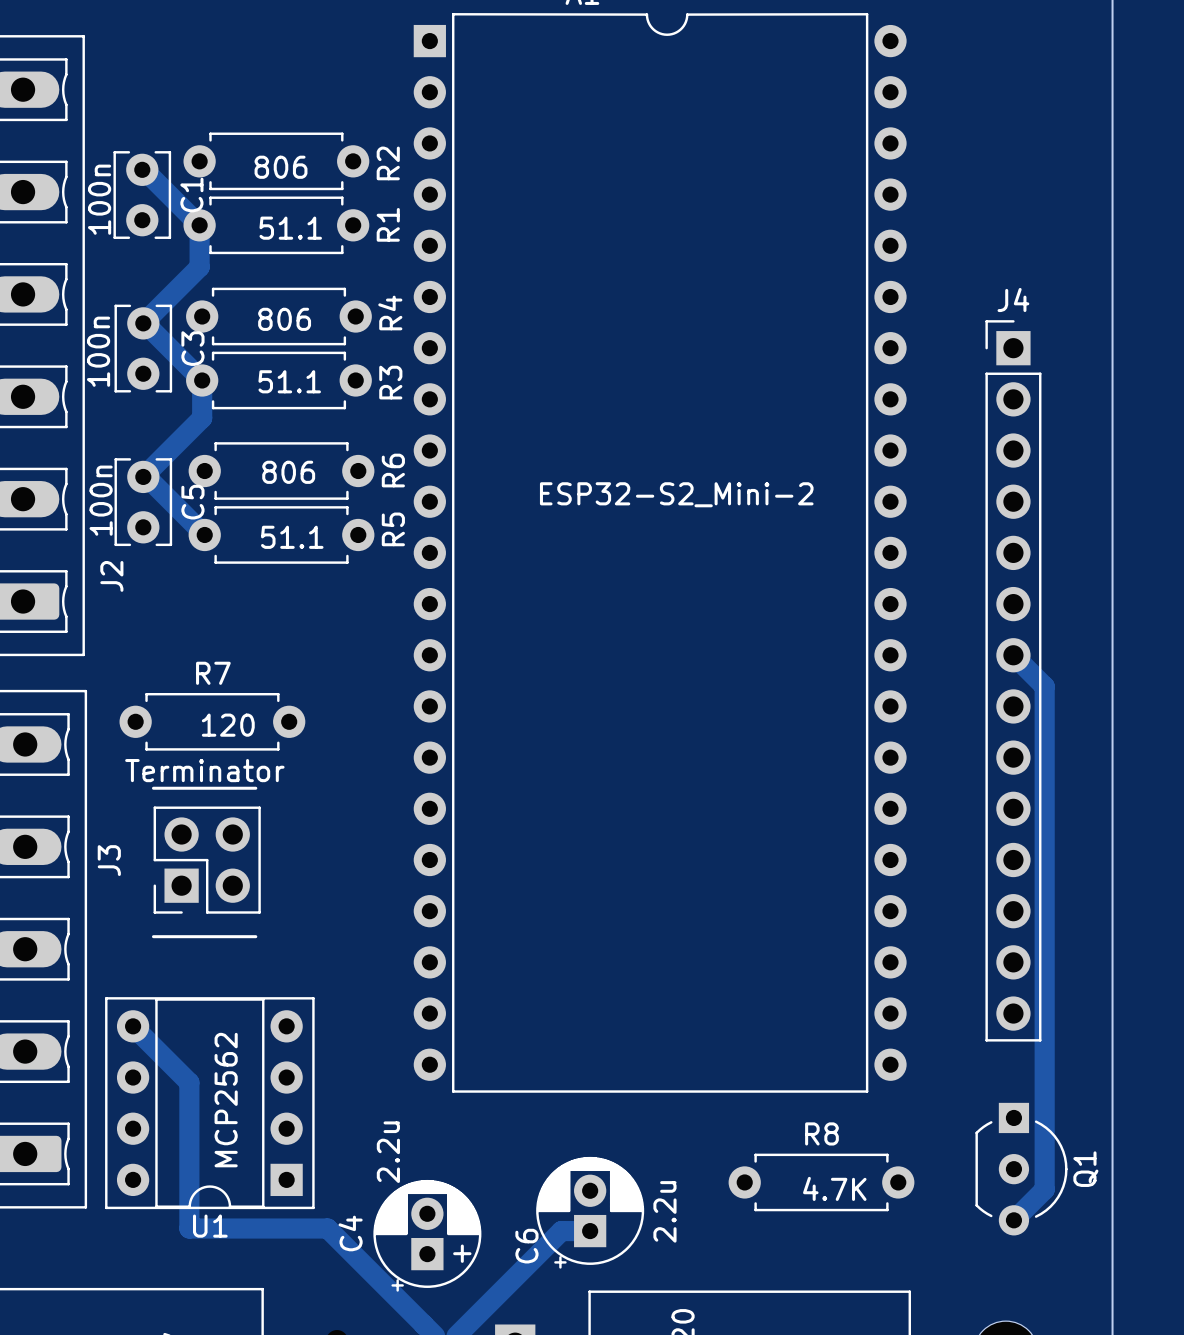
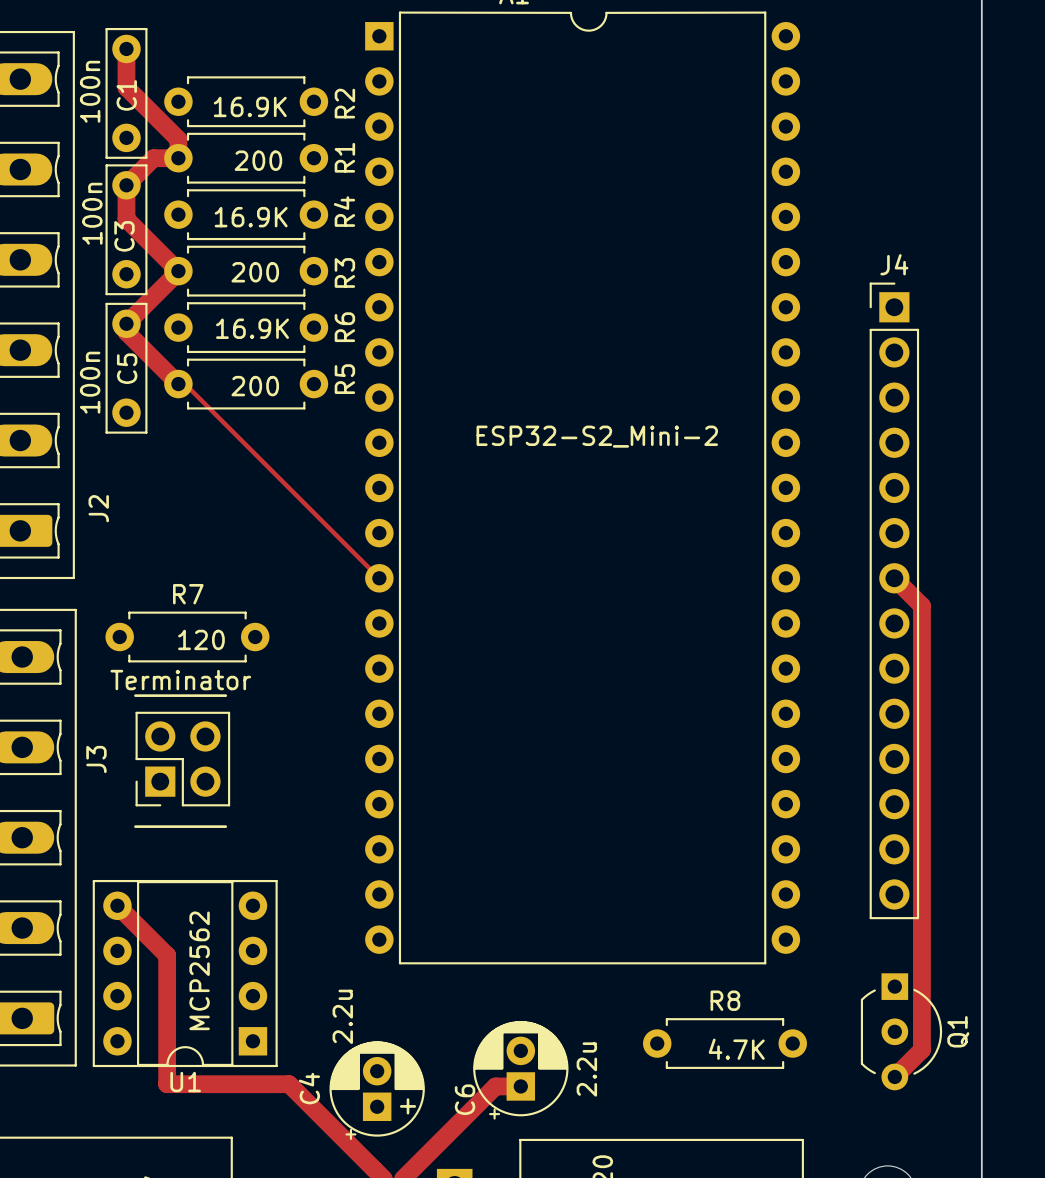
track: none -> (126, 48) (126, 87) (178, 139) (178, 158) (153, 158) (126, 185) (126, 219) (178, 271) (126, 323) (126, 332) (178, 384) (185, 384) (379, 578)
C1 footprint: [113, 151, 172, 239] -> [105, 27, 148, 159]
R2 position: (276, 161) -> (246, 101)
R2 value: 806 (281, 167) -> 16.9K (250, 106)
track: (142, 169) (199, 225) (199, 267) (143, 323) (202, 380) (202, 418) (143, 476) (146, 476) (204, 534) -> none
C1 name position: C1 (191, 195) -> C1 (126, 95)
R1 position: (276, 225) -> (246, 158)
R1 value: 51.1 (290, 228) -> 200 (258, 160)
C3 footprint: [114, 304, 173, 393] -> [105, 164, 148, 296]
R4 position: (278, 316) -> (246, 214)
R4 value: 806 (284, 319) -> 16.9K (251, 217)
C3 name position: C3 (192, 348) -> C3 (124, 236)
R3 position: (278, 380) -> (246, 271)
R3 value: 51.1 (289, 381) -> 200 (255, 272)
C5 footprint: [114, 458, 173, 547] -> [105, 302, 148, 434]
R6 position: (281, 471) -> (246, 327)
R6 value: 806 (288, 472) -> 16.9K (252, 328)
C5 name position: C5 (192, 502) -> C5 (127, 368)
R5 position: (281, 534) -> (246, 384)
R5 value: 51.1 (292, 537) -> 200 (255, 386)

